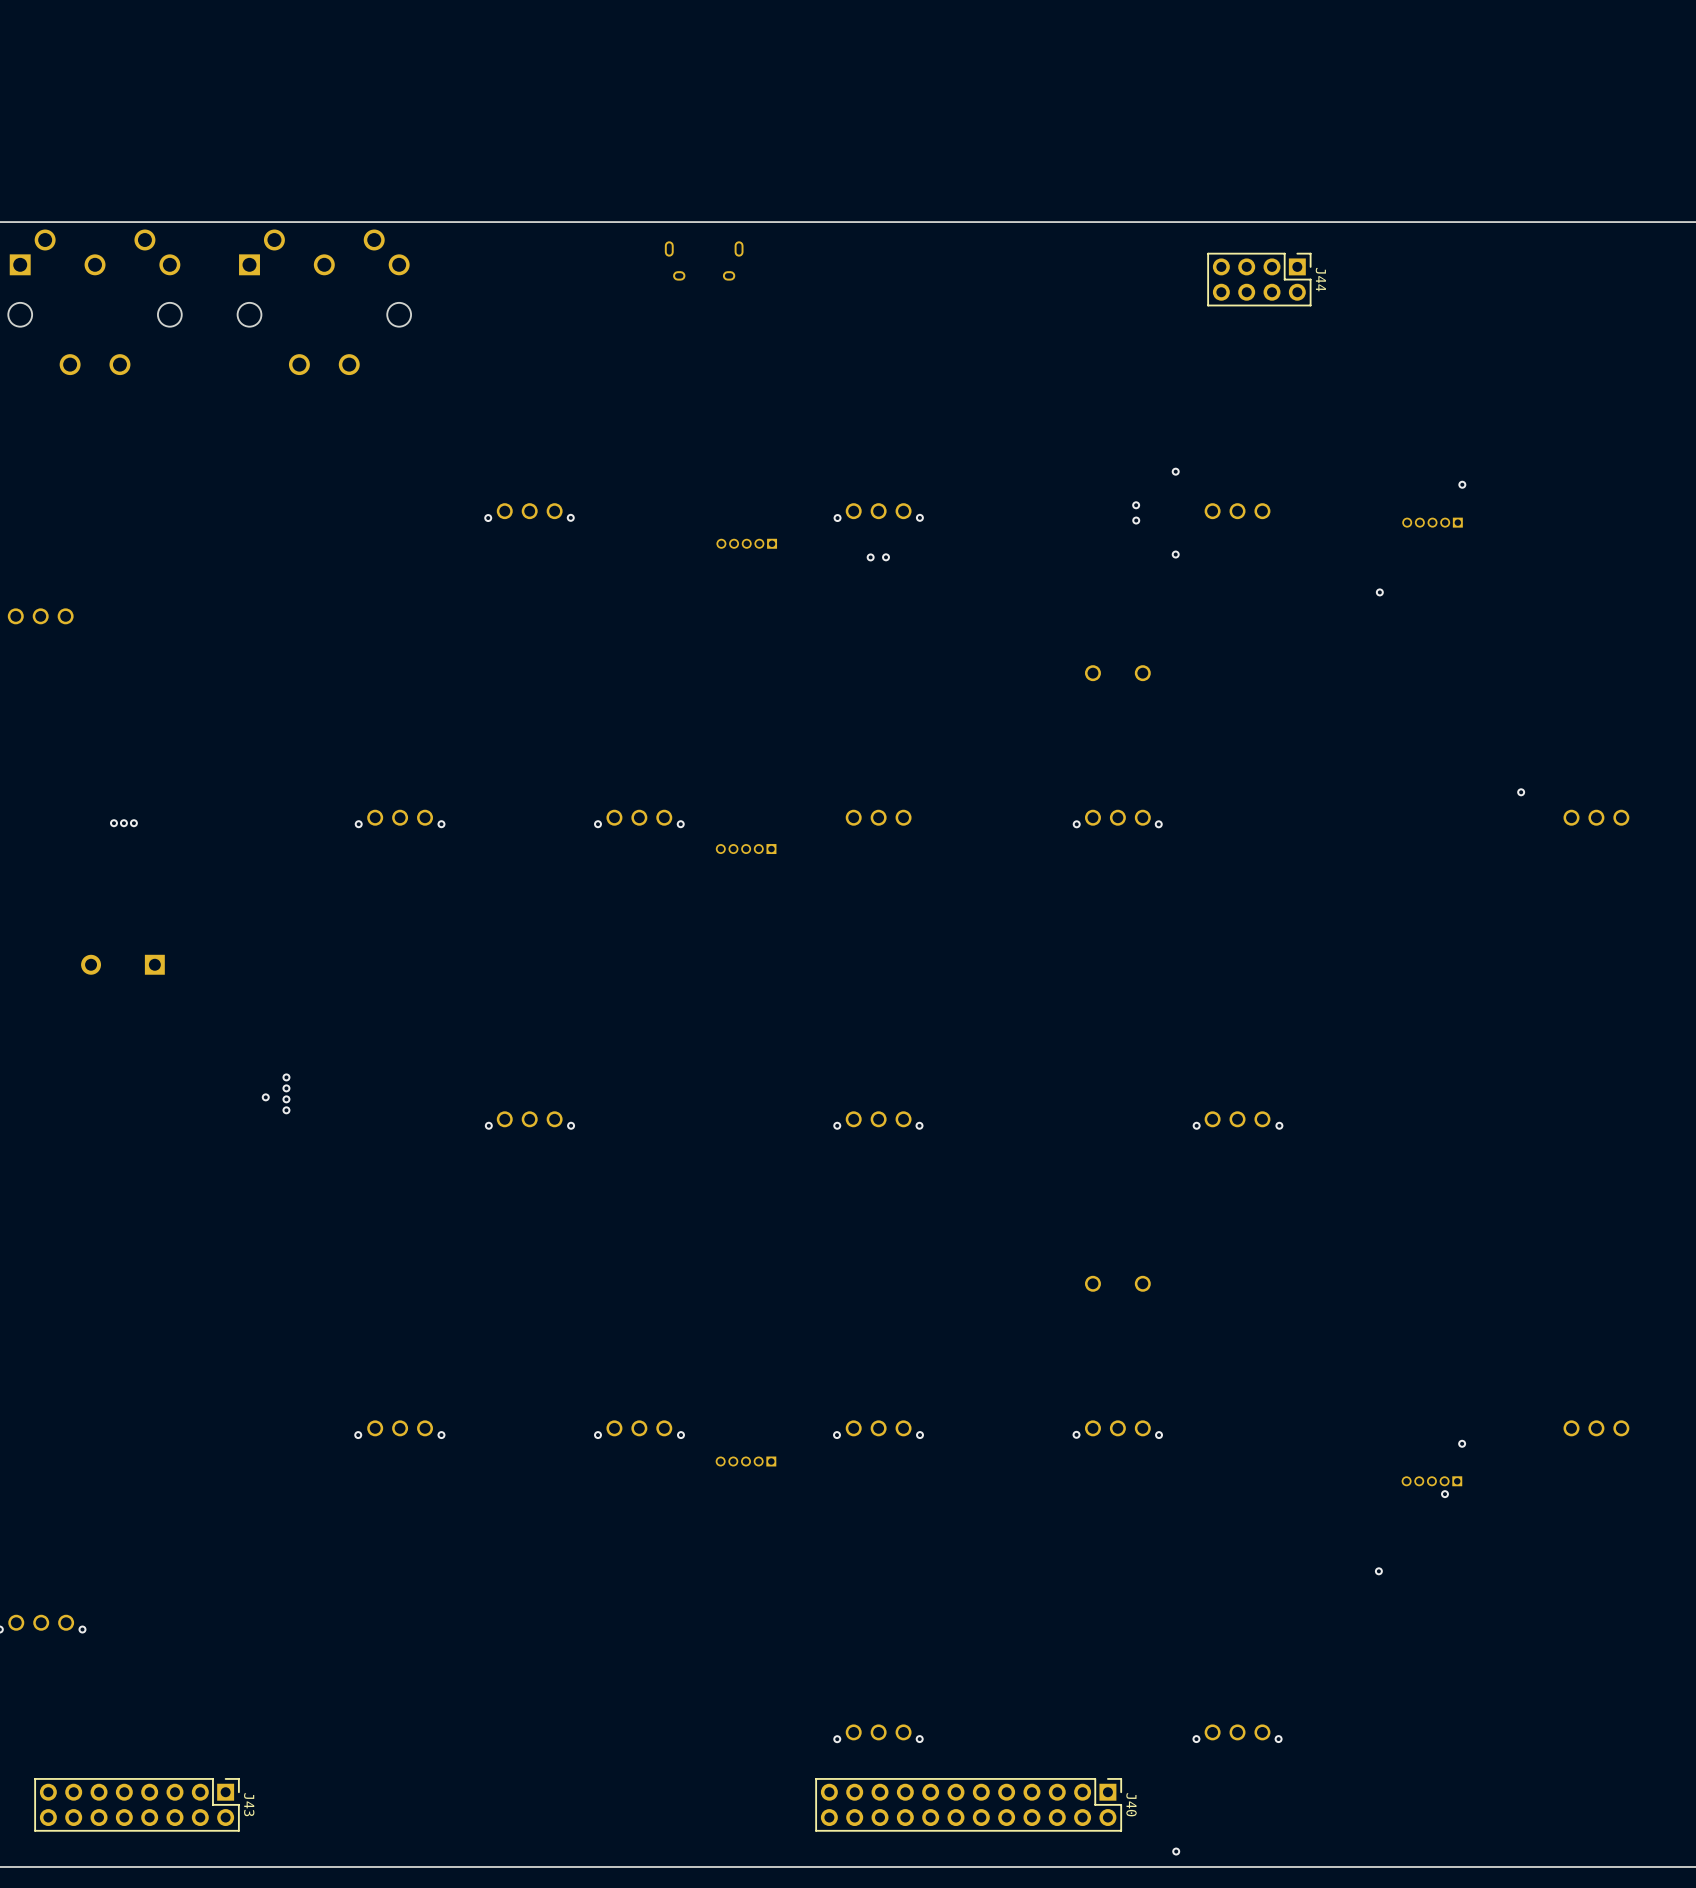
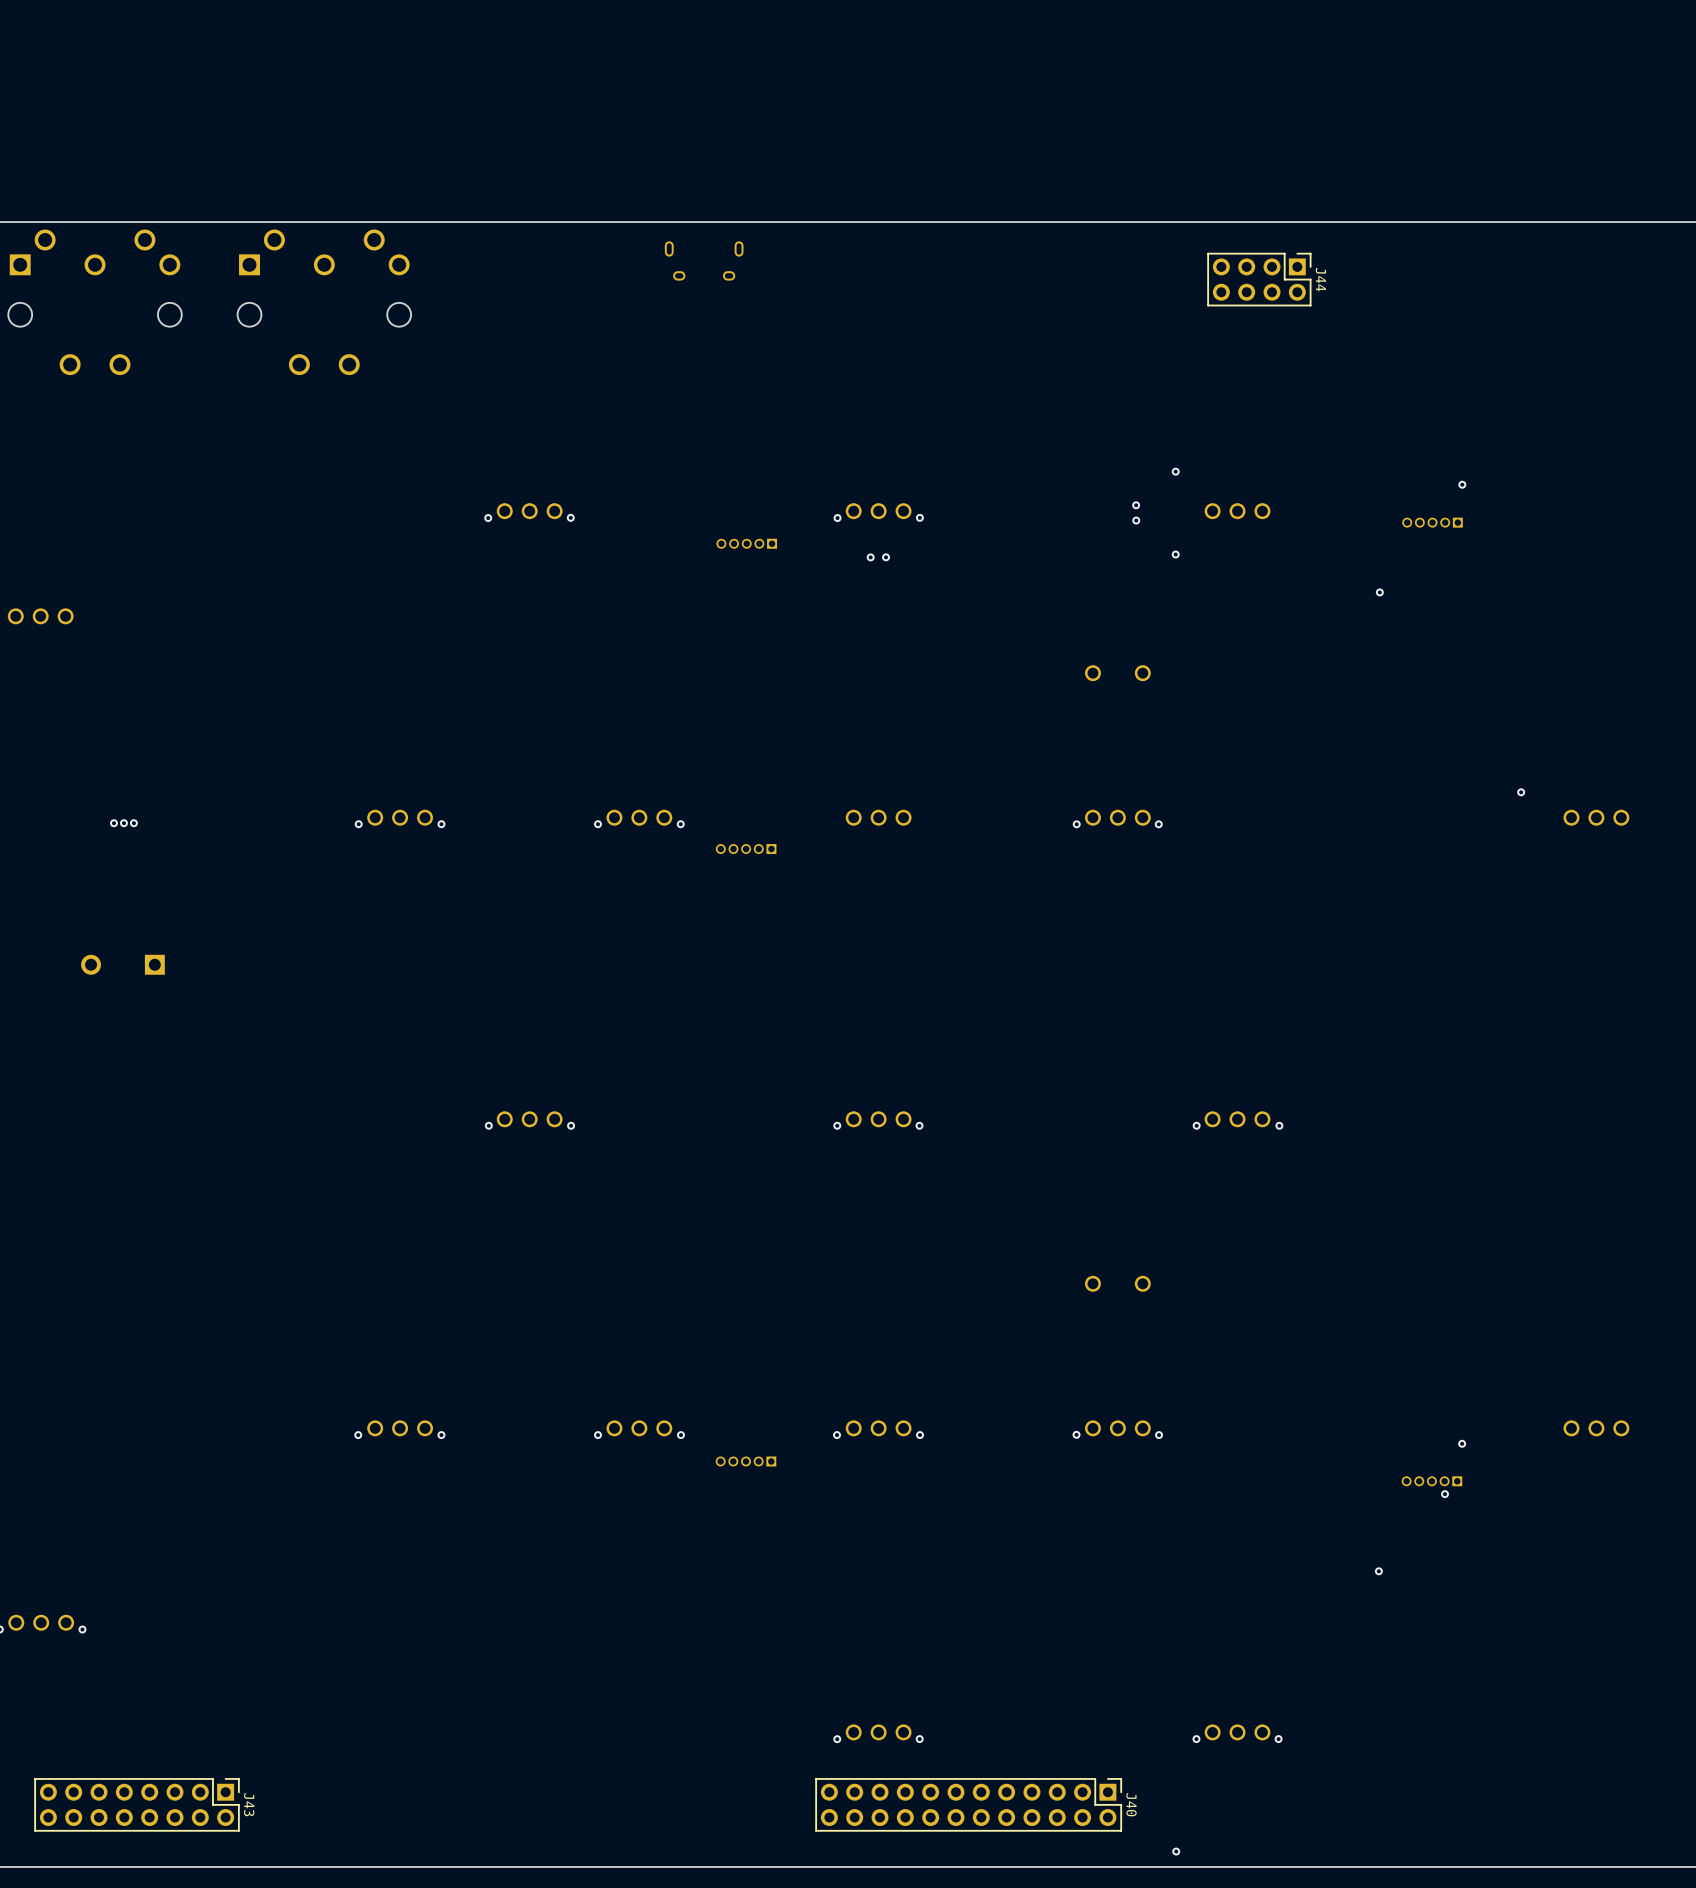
via: (286, 1077) -> none
via: (286, 1088) -> none
via: (265, 1097) -> none
via: (286, 1099) -> none
via: (286, 1110) -> none

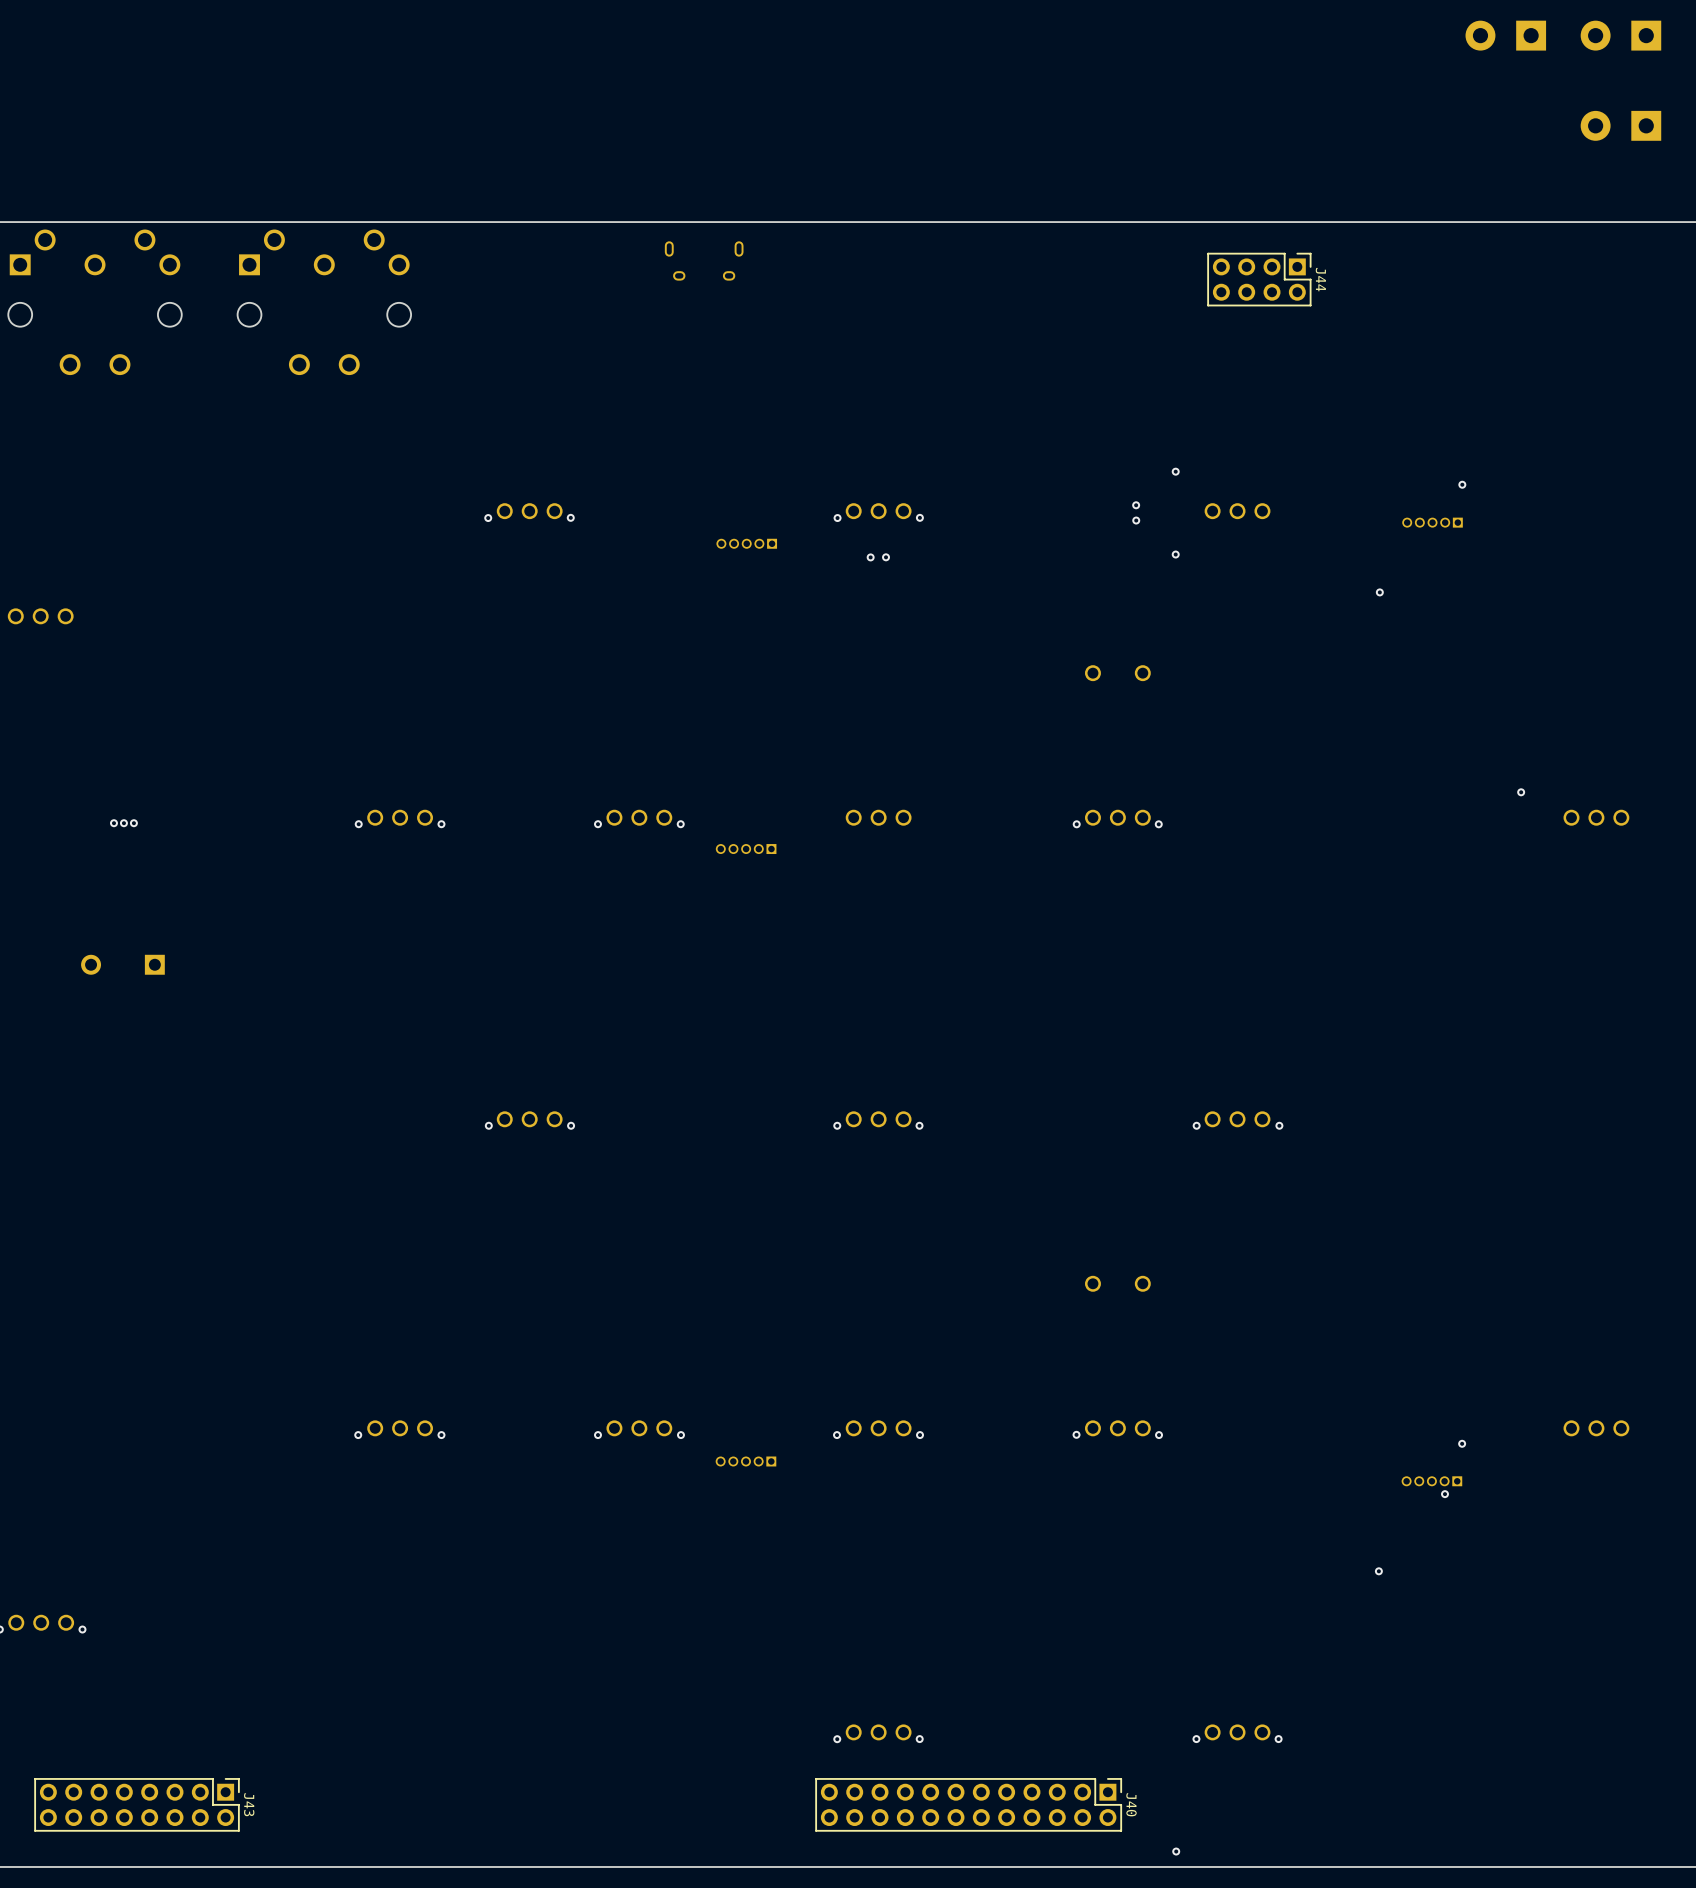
part: none -> (1505, 35)
part: none -> (1620, 35)
part: none -> (1620, 125)

